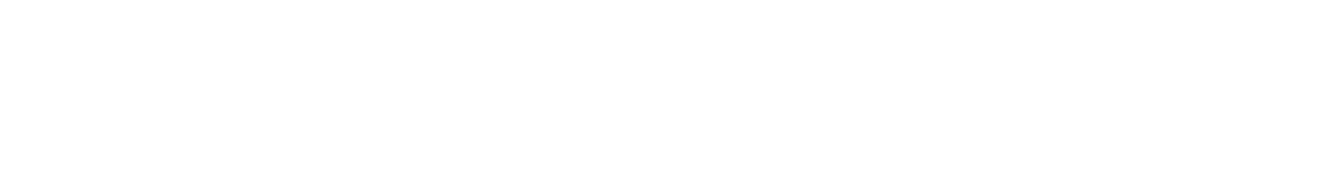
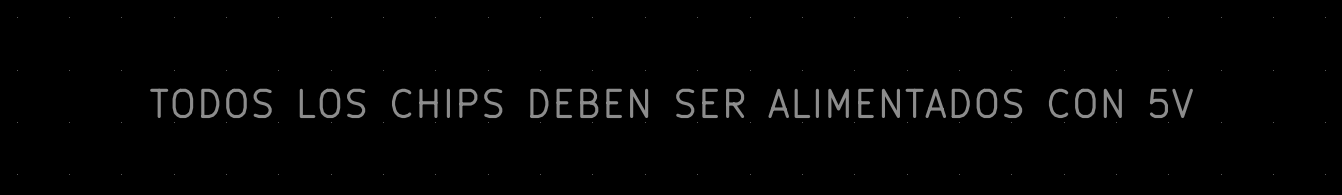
text: none -> TODOS LOS CHIPS DEBEN SER ALIMENTADOS CON 5V (671, 103)

